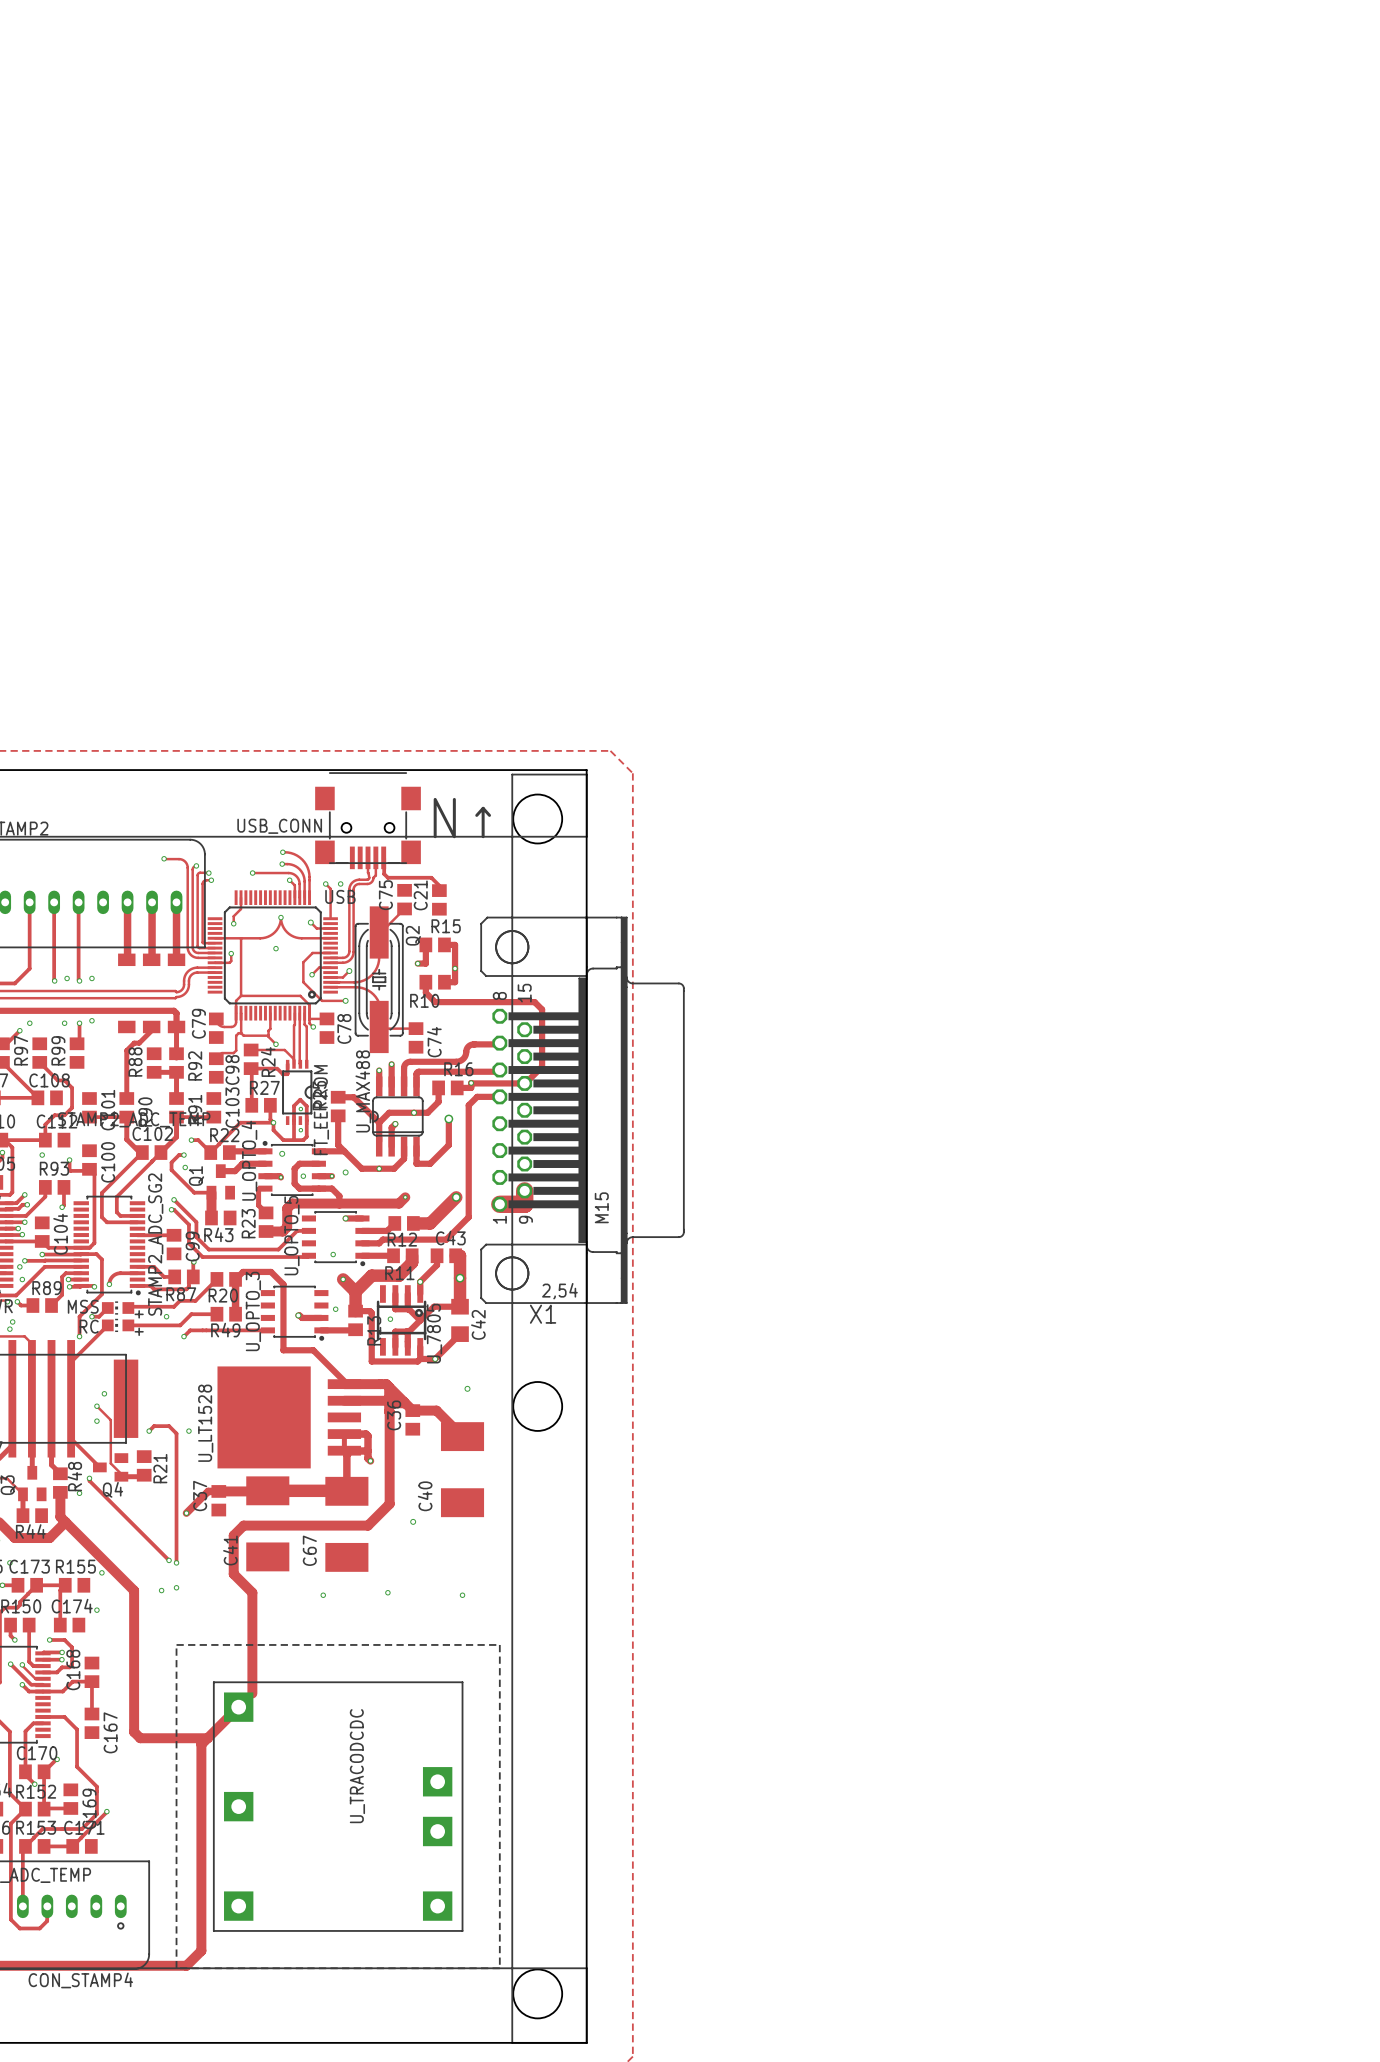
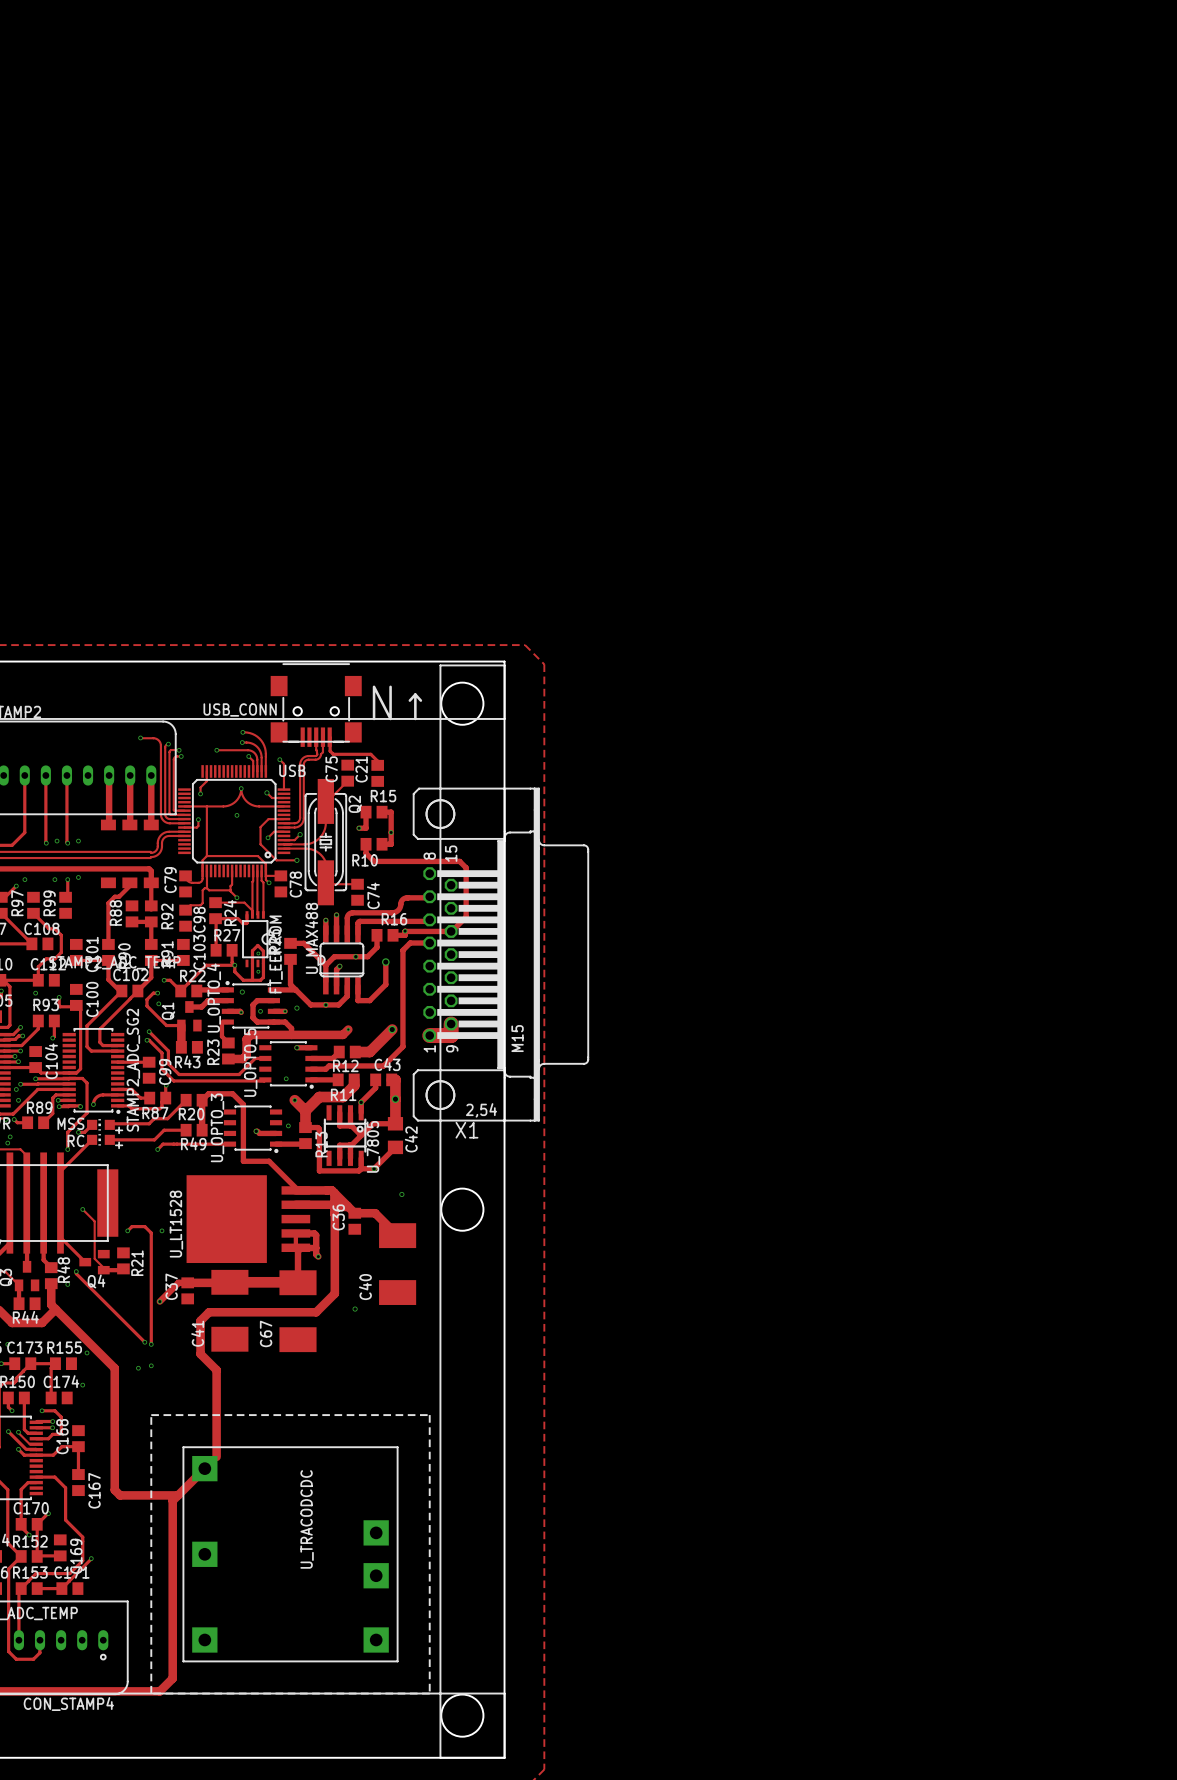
via: (340, 883) -> none
via: (166, 1316) -> none
via: (390, 1319) -> none
via: (104, 1393) -> none
via: (96, 1421) -> none
via: (387, 1592) -> none
via: (323, 1595) -> none
via: (462, 1595) -> none

